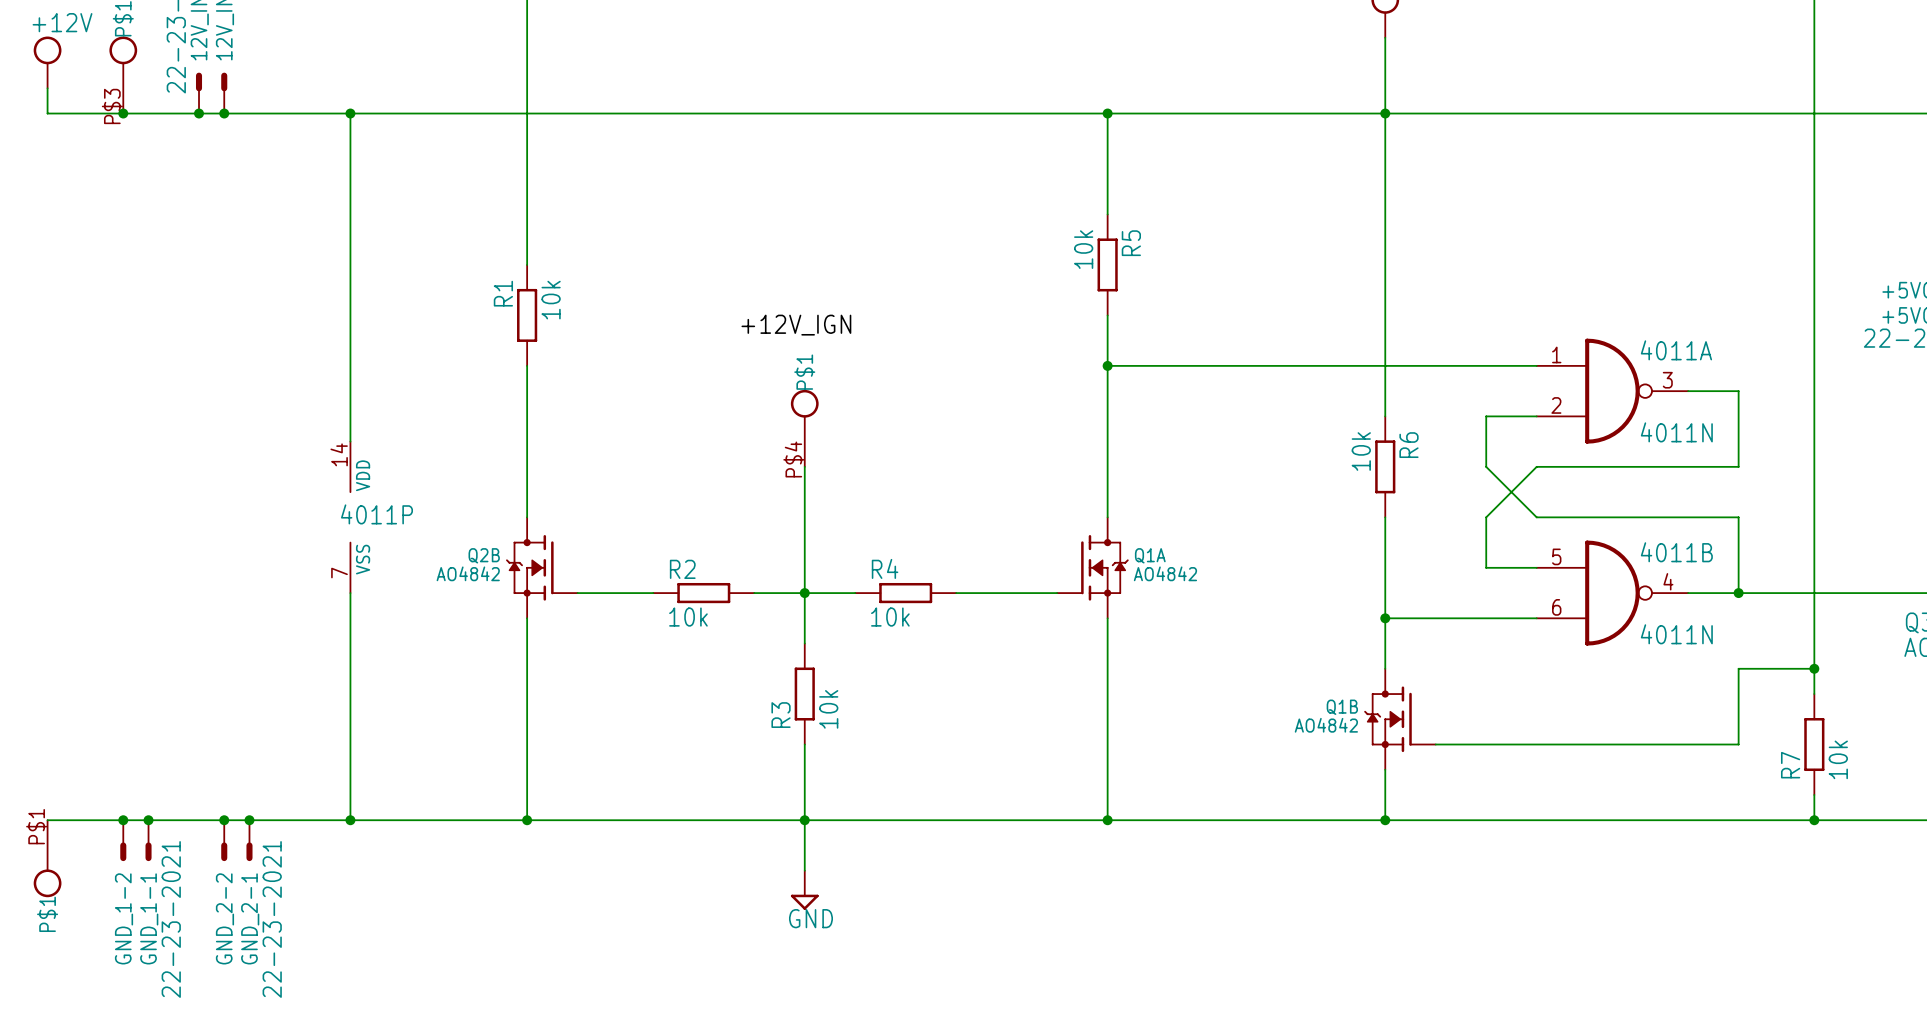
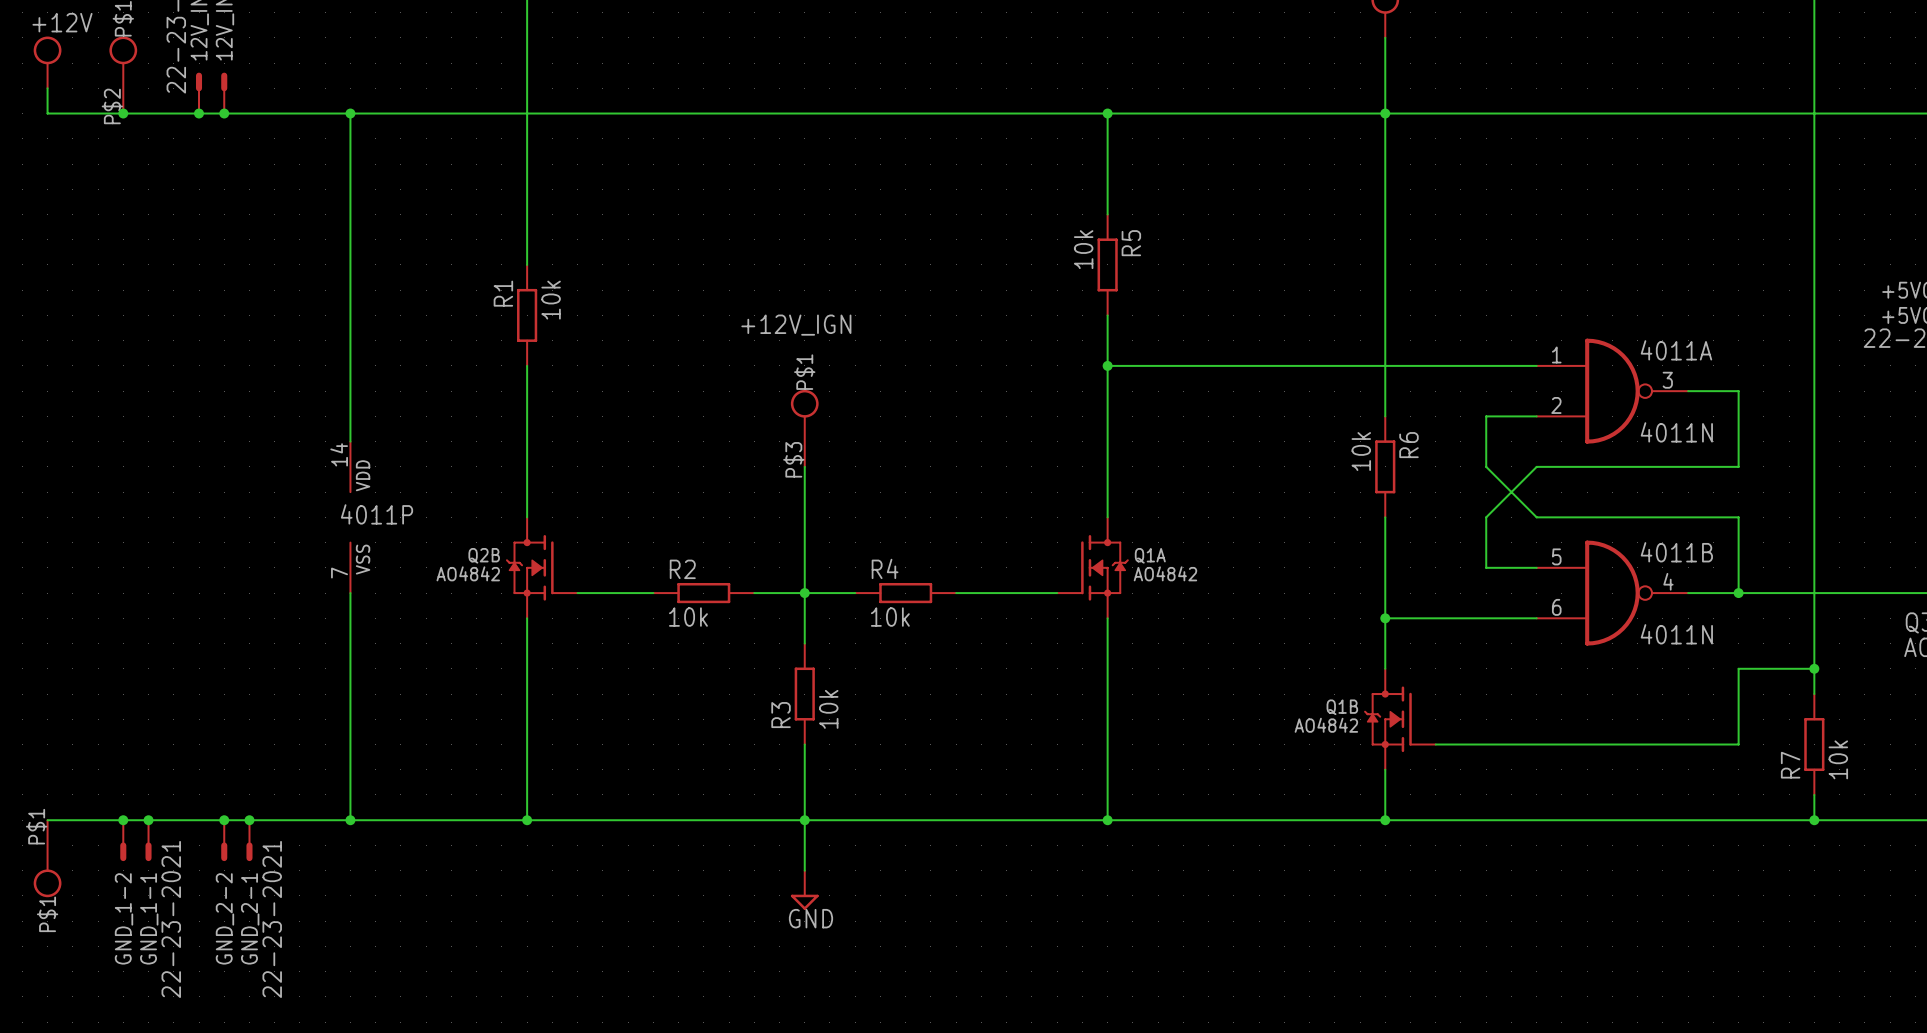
part pin number: P$3 (112, 106) -> P$2 (112, 106)
part pin number: P$4 (793, 459) -> P$3 (793, 459)

